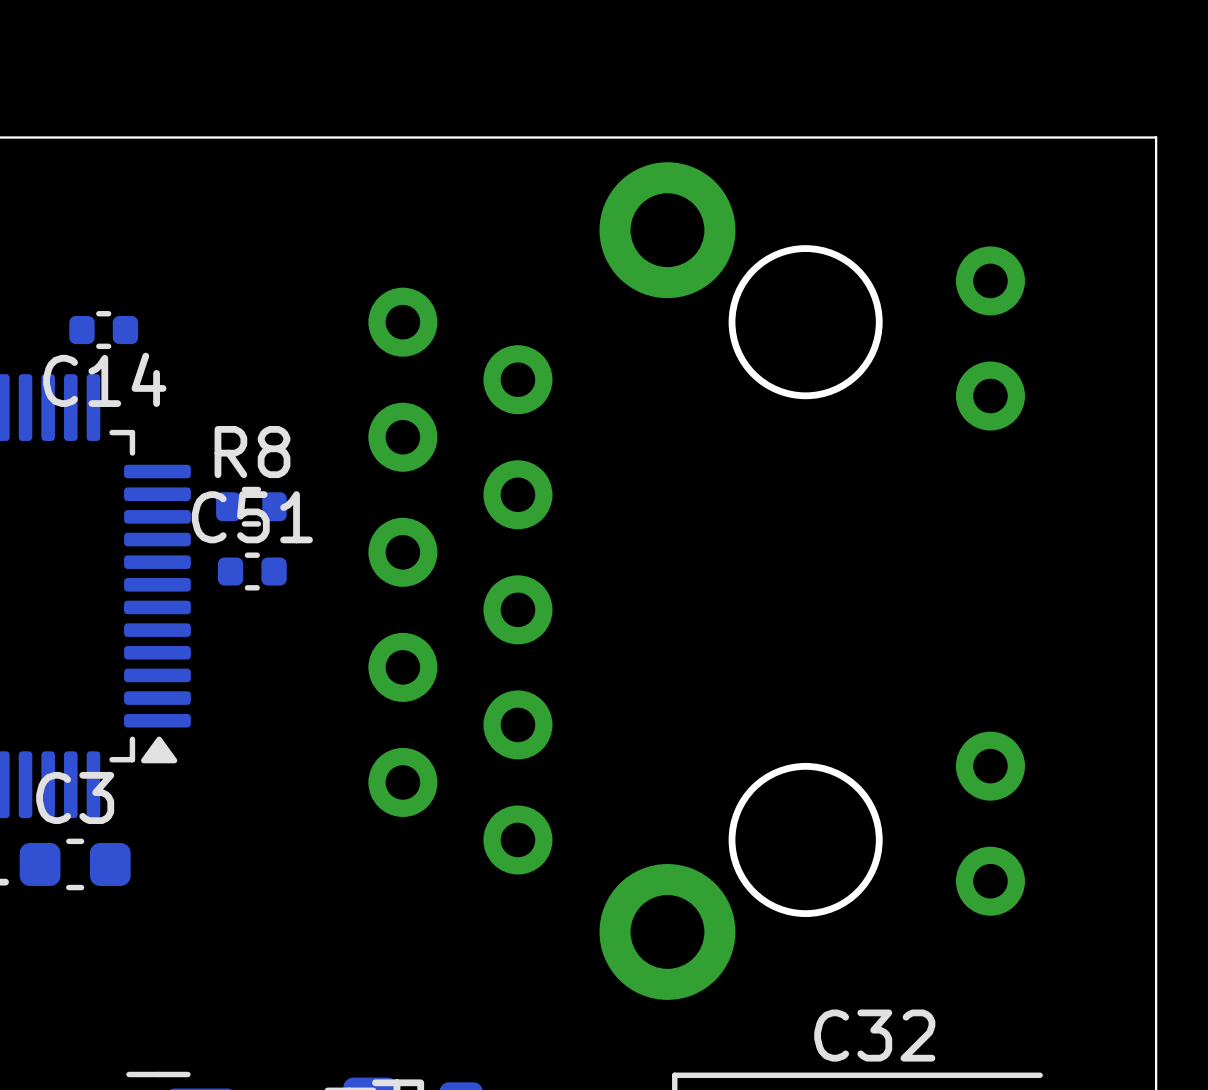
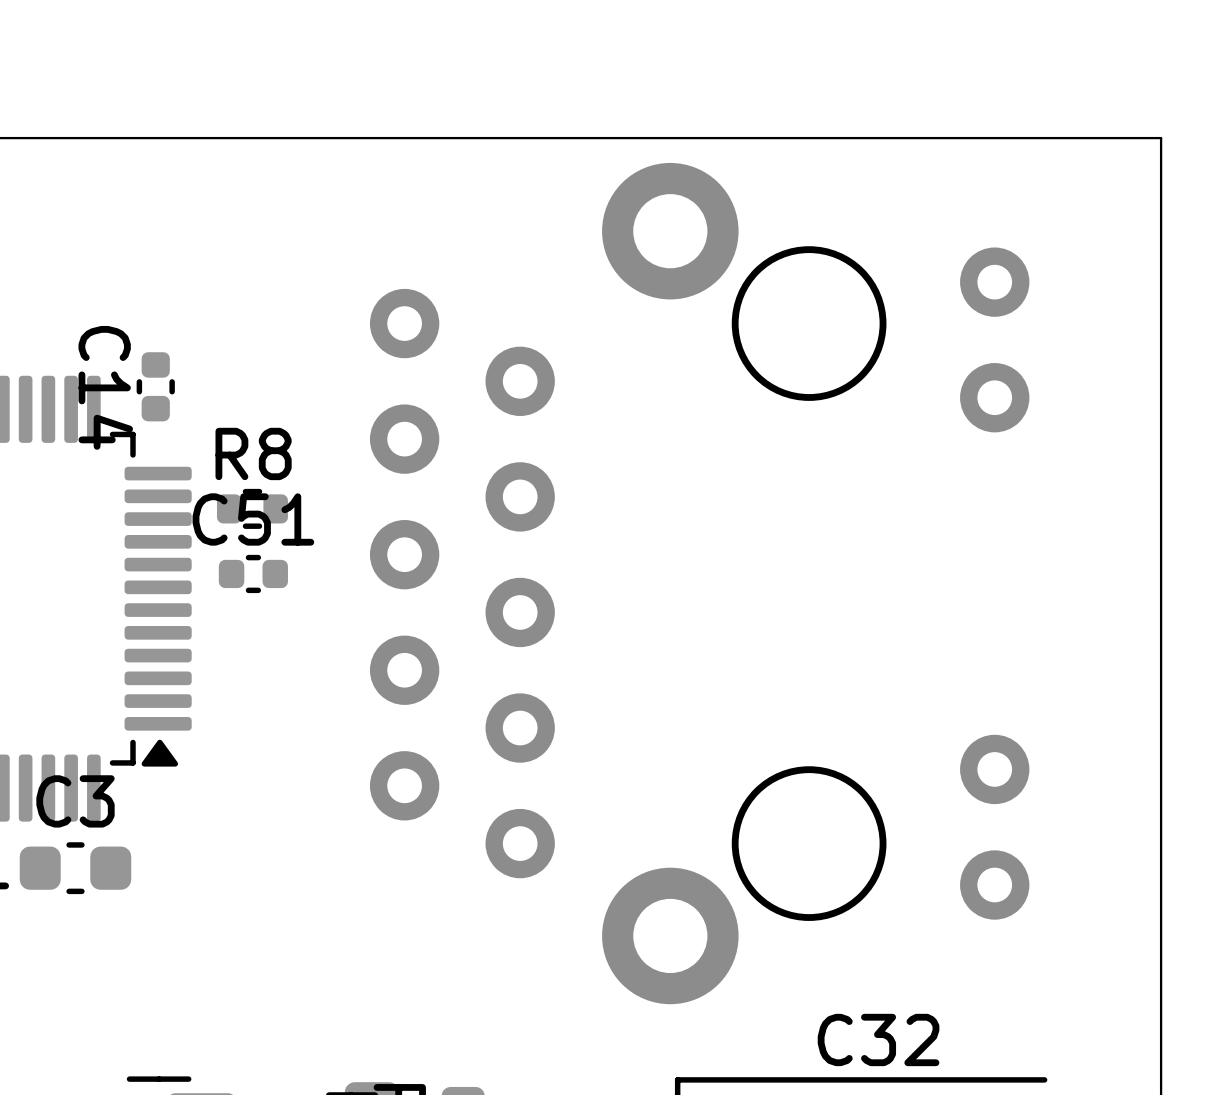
C14 rotation: 0° (103, 330) -> 90° clockwise (155, 386)
C14 position: (103, 330) -> (155, 386)

